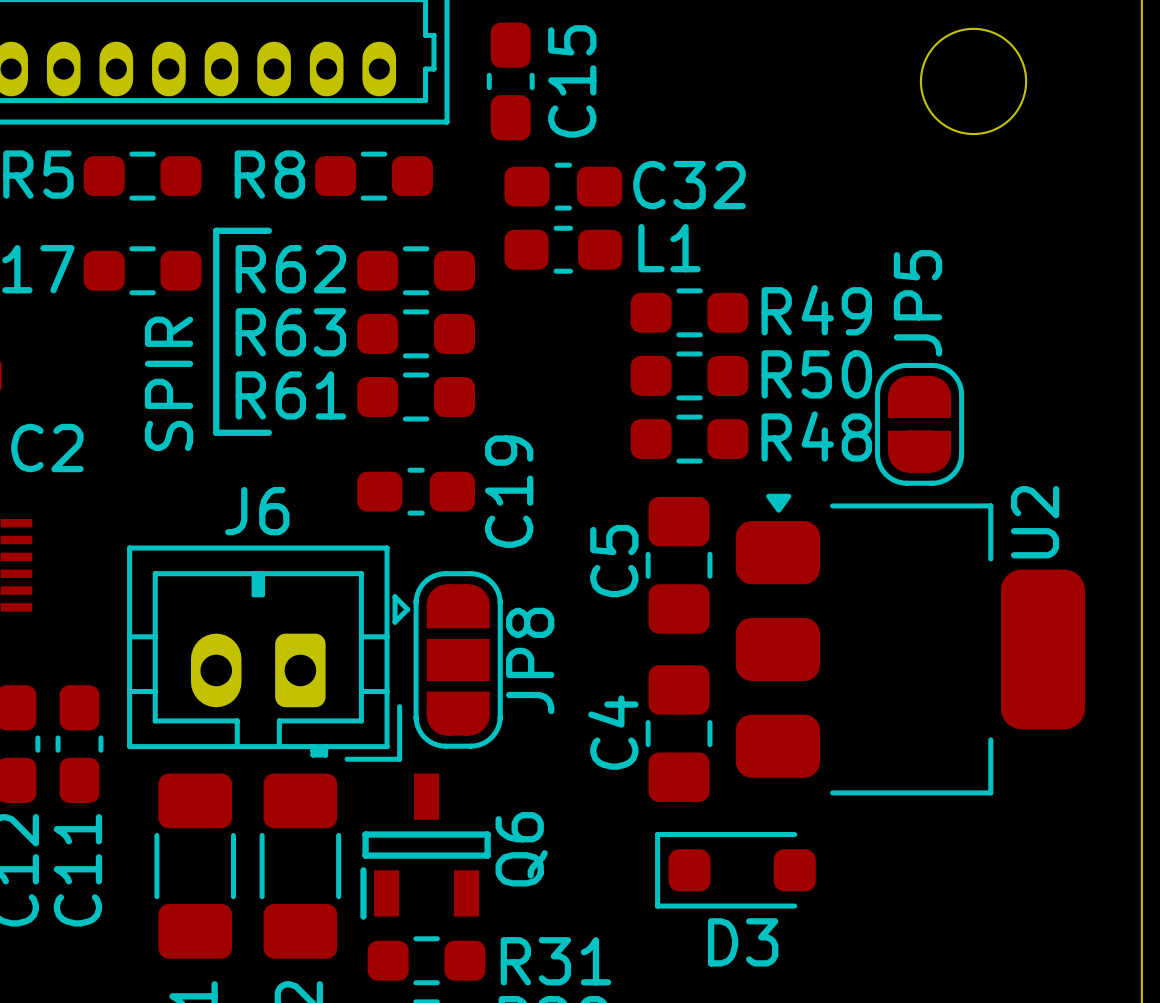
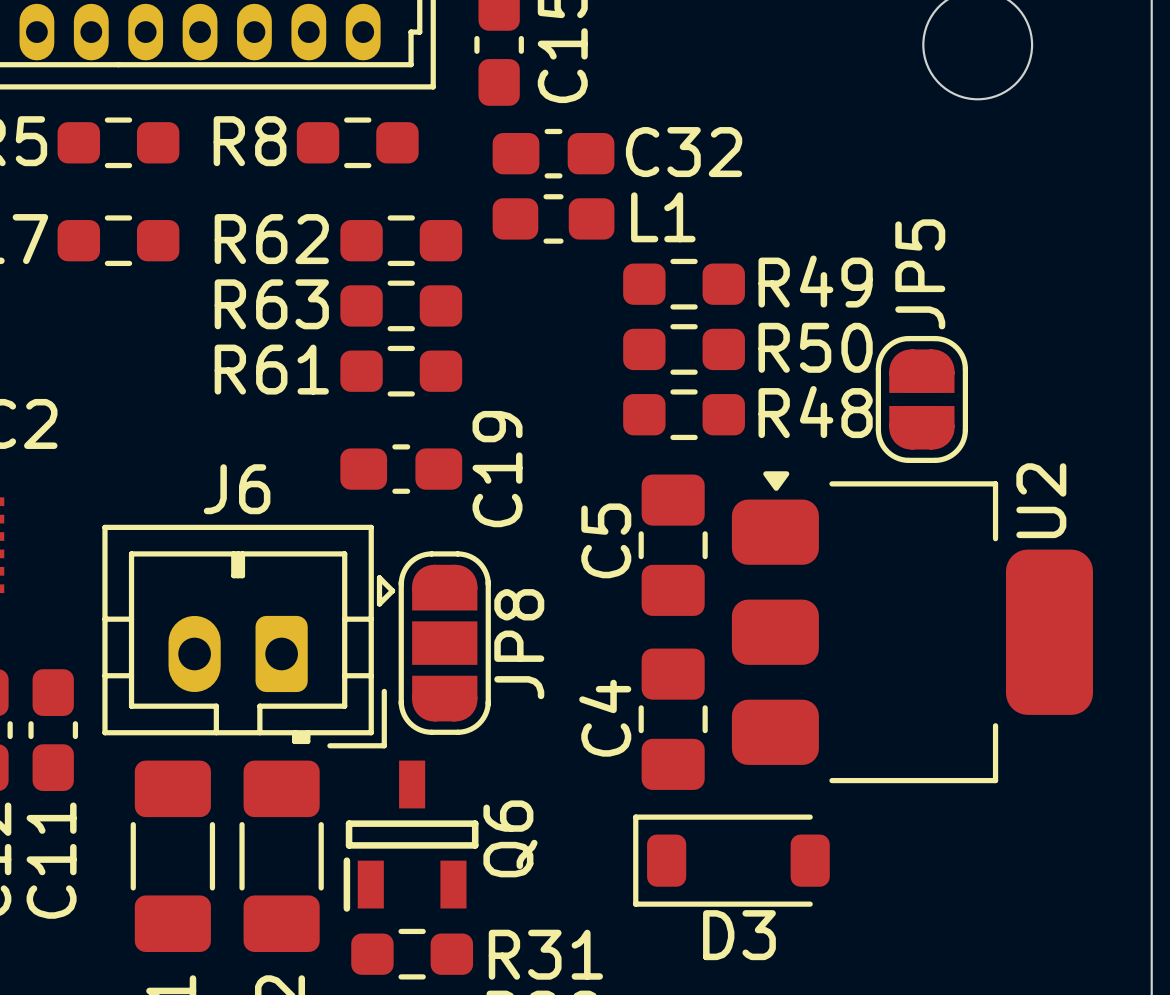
line: (268, 230) (216, 230) (216, 432) (268, 432) -> none
text: SPIR (169, 383) -> none
D3 footprint: [655, 832, 816, 909] -> [633, 814, 830, 907]

